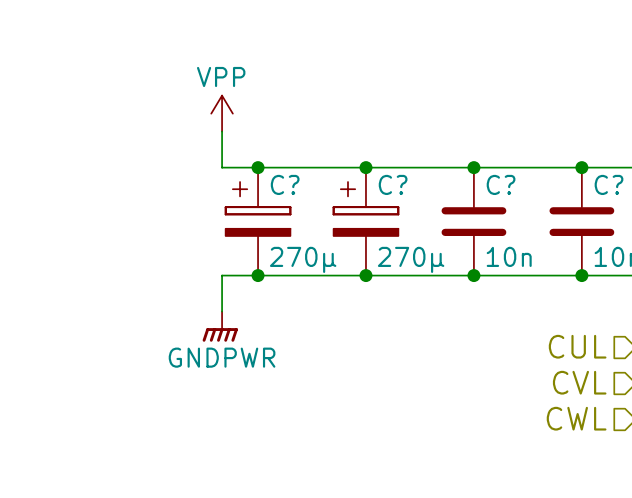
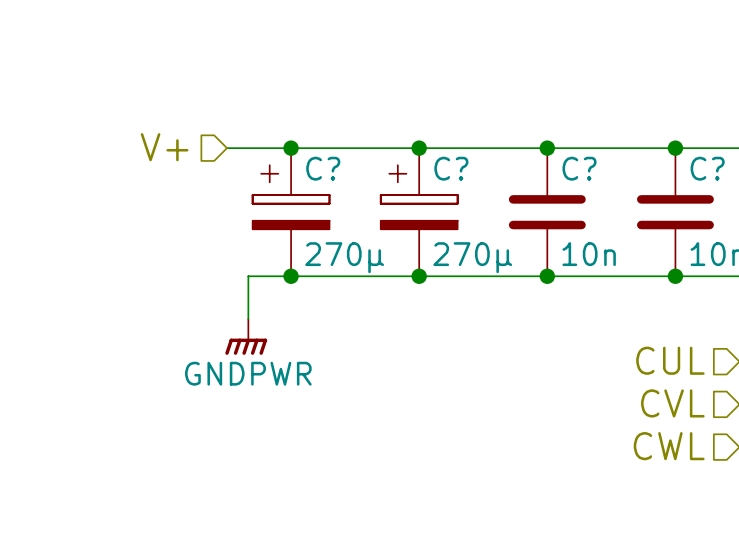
power symbol: VPP (222, 113) -> none
wire: (222, 131) (222, 167) -> (227, 148) (248, 148)
hierarchical label: none -> V+ (164, 147)

